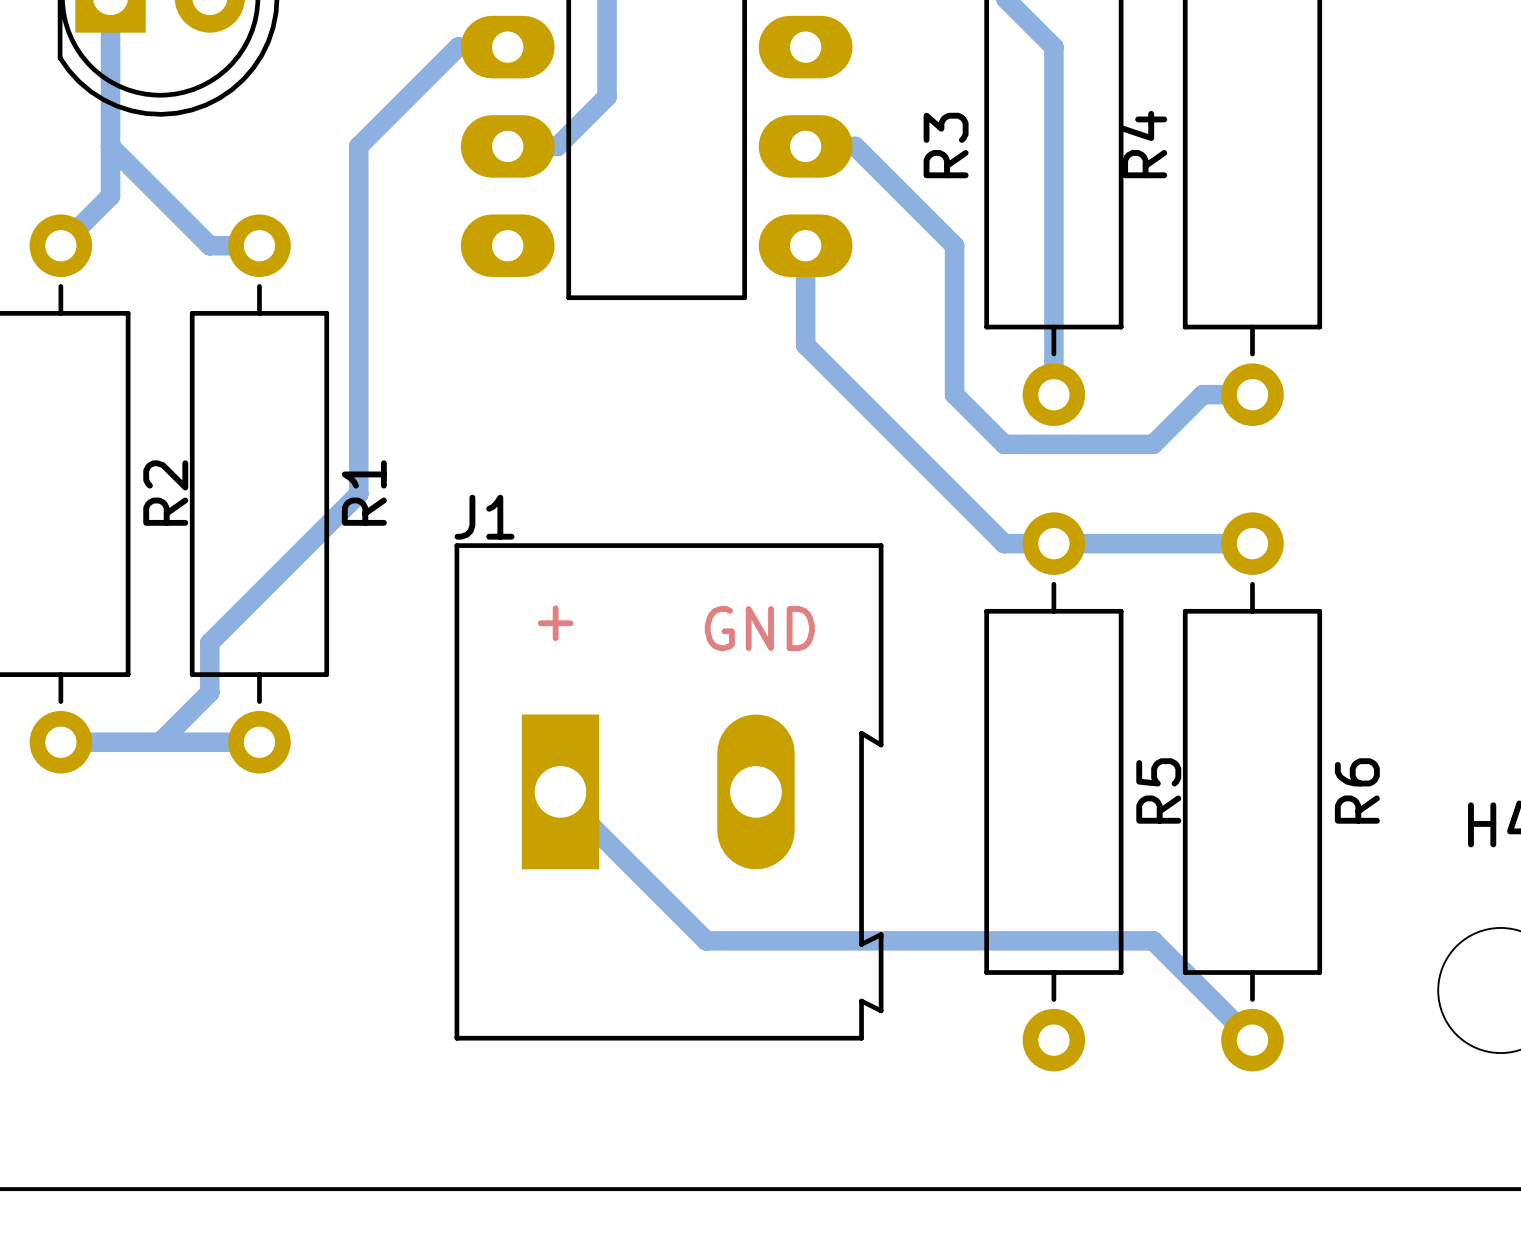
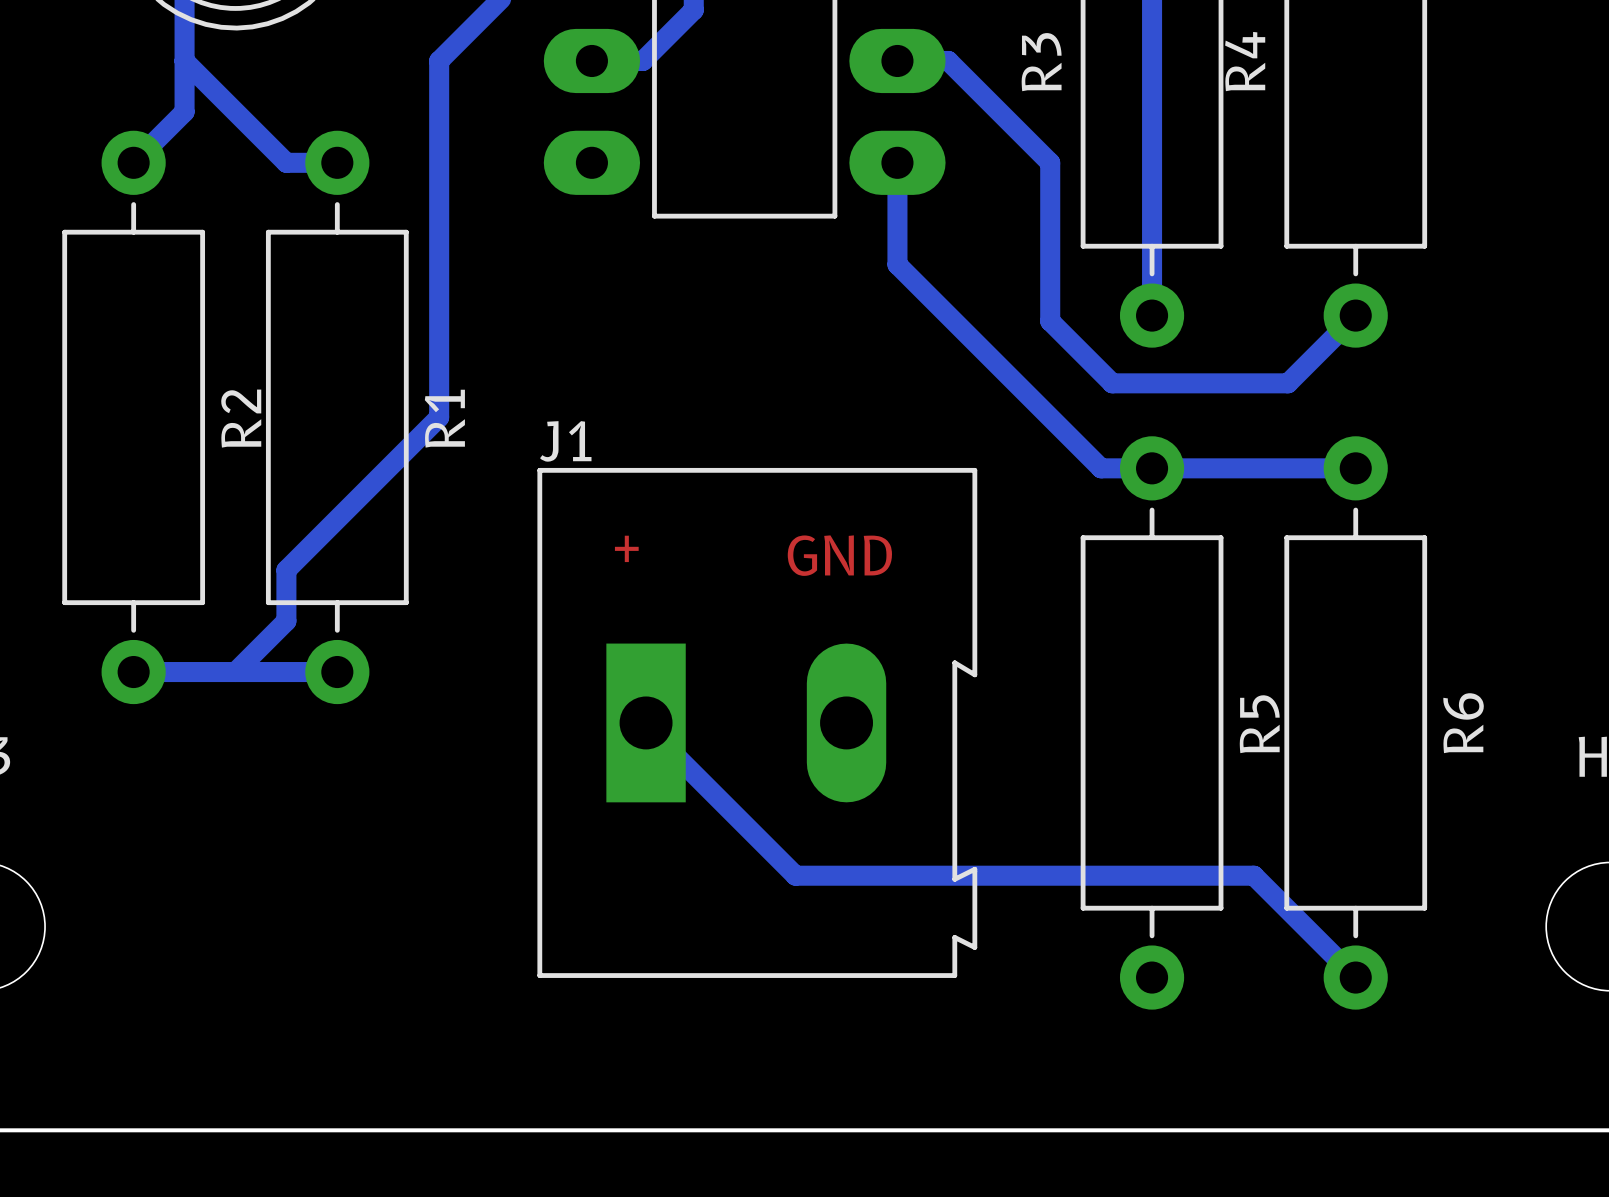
bottom track: (954, 394) (1004, 444) (1153, 444) (1202, 394) (1252, 394) -> (1050, 315) (1050, 321) (1112, 383) (1287, 383) (1355, 315)

